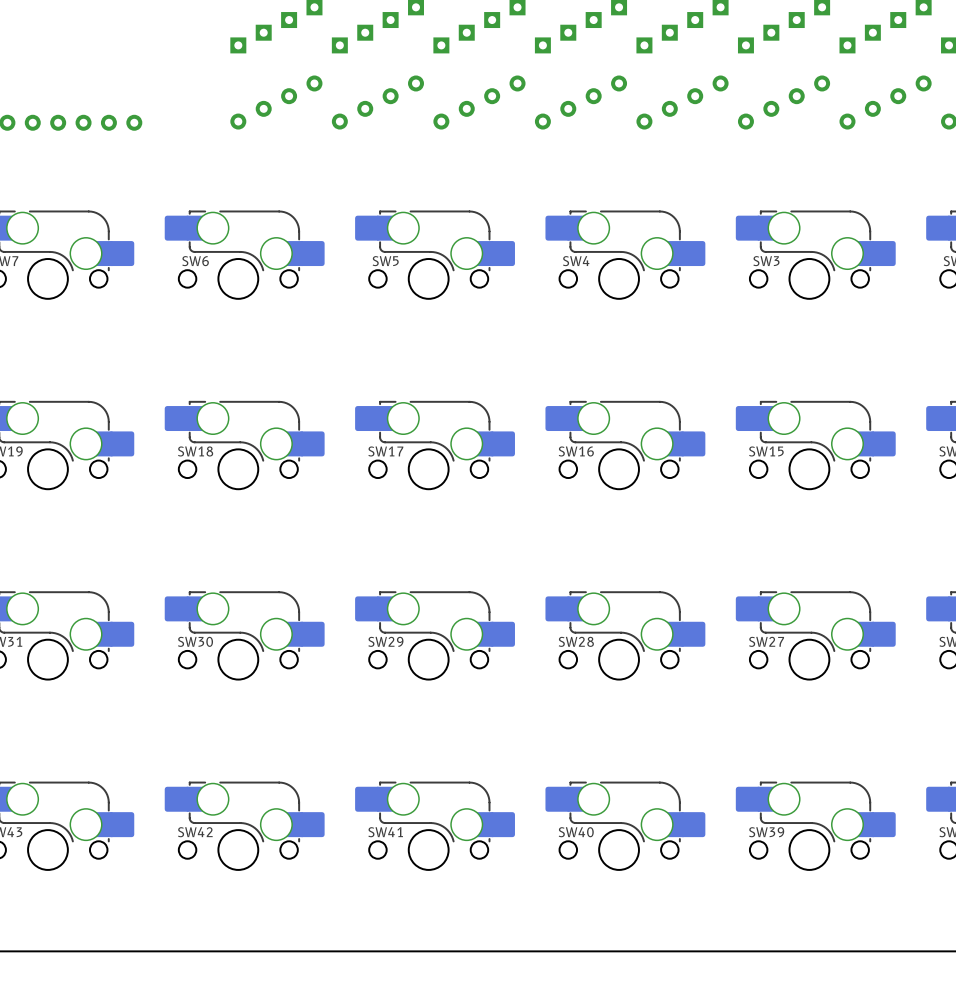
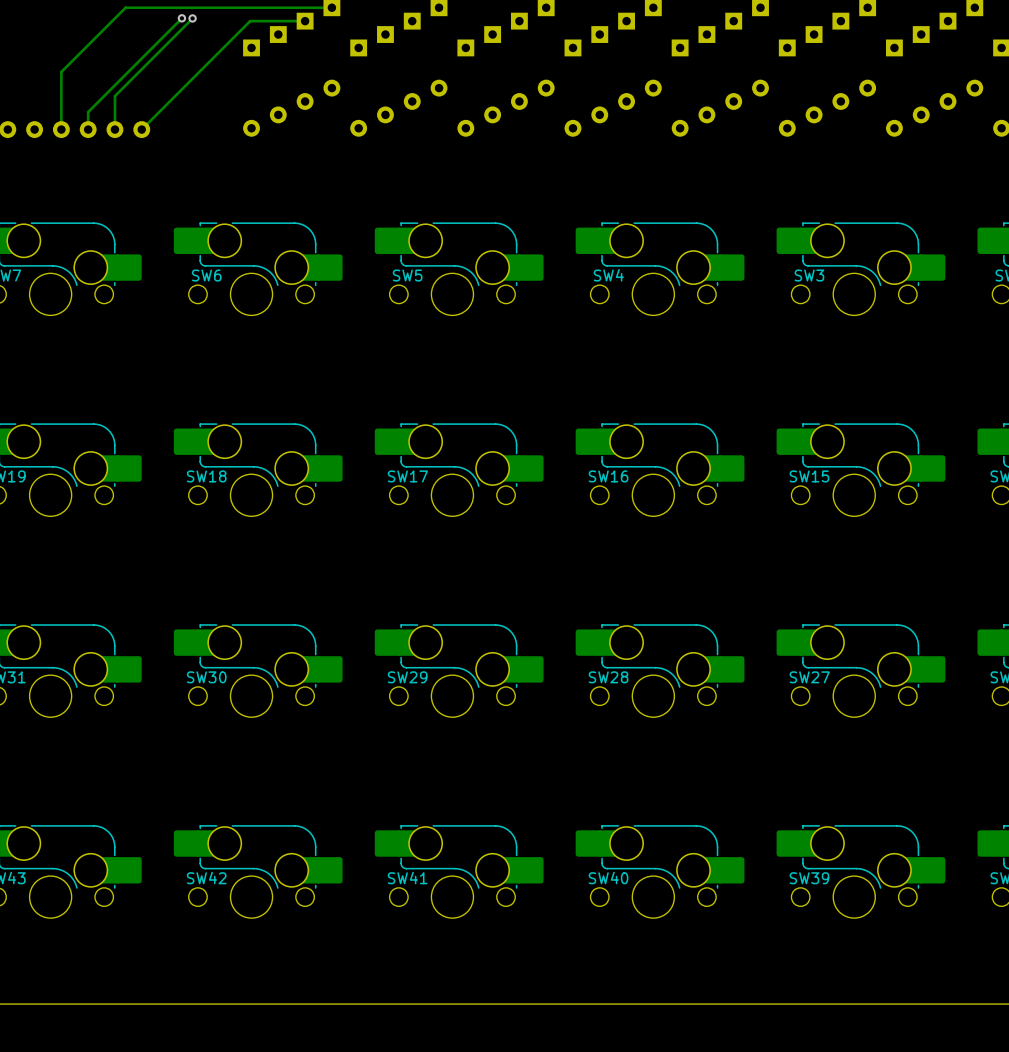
track: none -> (331, 7) (125, 7) (61, 71) (61, 129)
track: none -> (181, 18) (88, 112) (88, 129)
via: none -> (181, 18)
track: none -> (192, 18) (114, 96) (114, 129)
via: none -> (192, 18)
track: none -> (305, 21) (250, 21) (141, 129)

